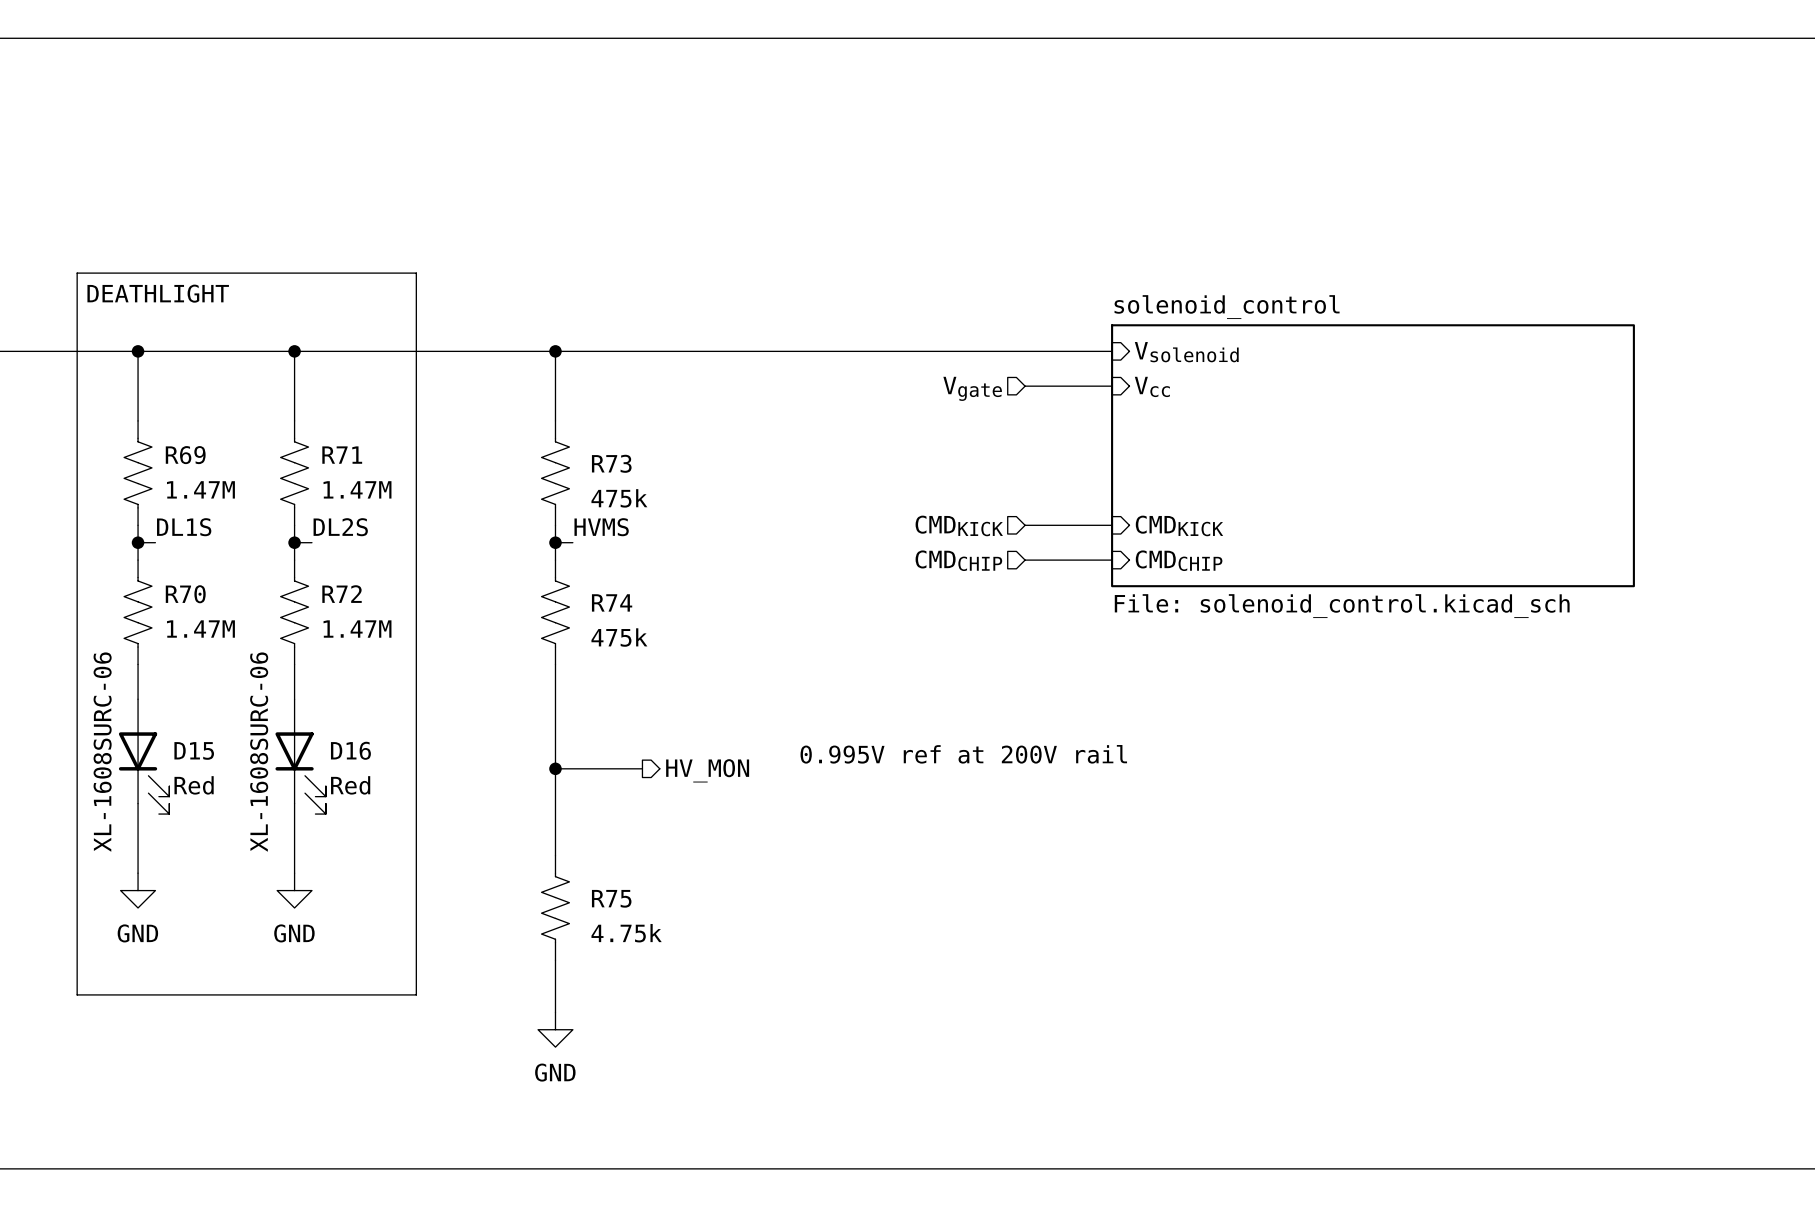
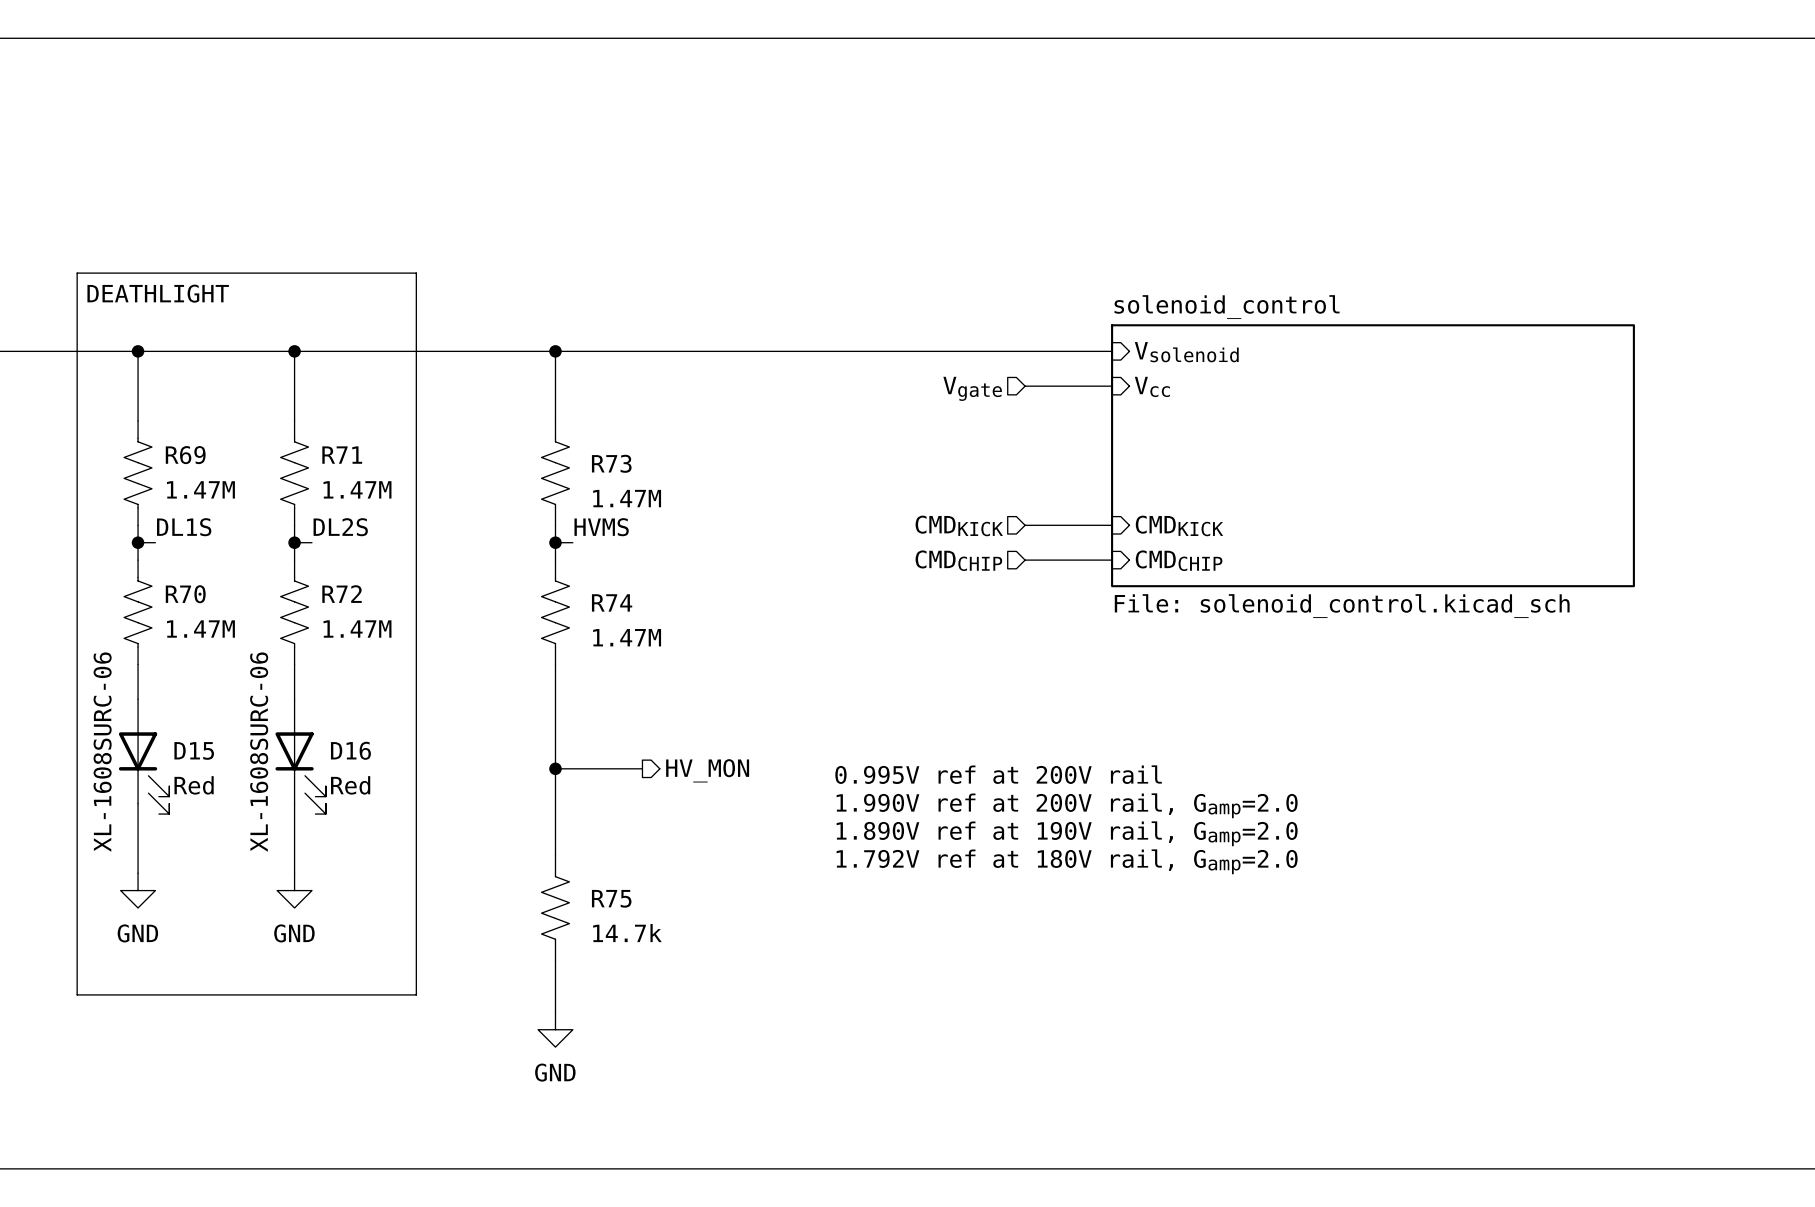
R73 value: 475k (619, 498) -> 1.47M (627, 498)
R74 value: 475k (619, 637) -> 1.47M (627, 637)
text position: 0.995V ref at 200V rail (963, 754) -> 0.995V ref at 200V rail (998, 774)
text: none -> 1.990V ref at 200V rail, Gamp=2.0 (1067, 805)
text: none -> 1.890V ref at 190V rail, Gamp=2.0 (1067, 833)
text: none -> 1.792V ref at 180V rail, Gamp=2.0 (1067, 861)
R75 value: 4.75k (626, 933) -> 14.7k (627, 933)

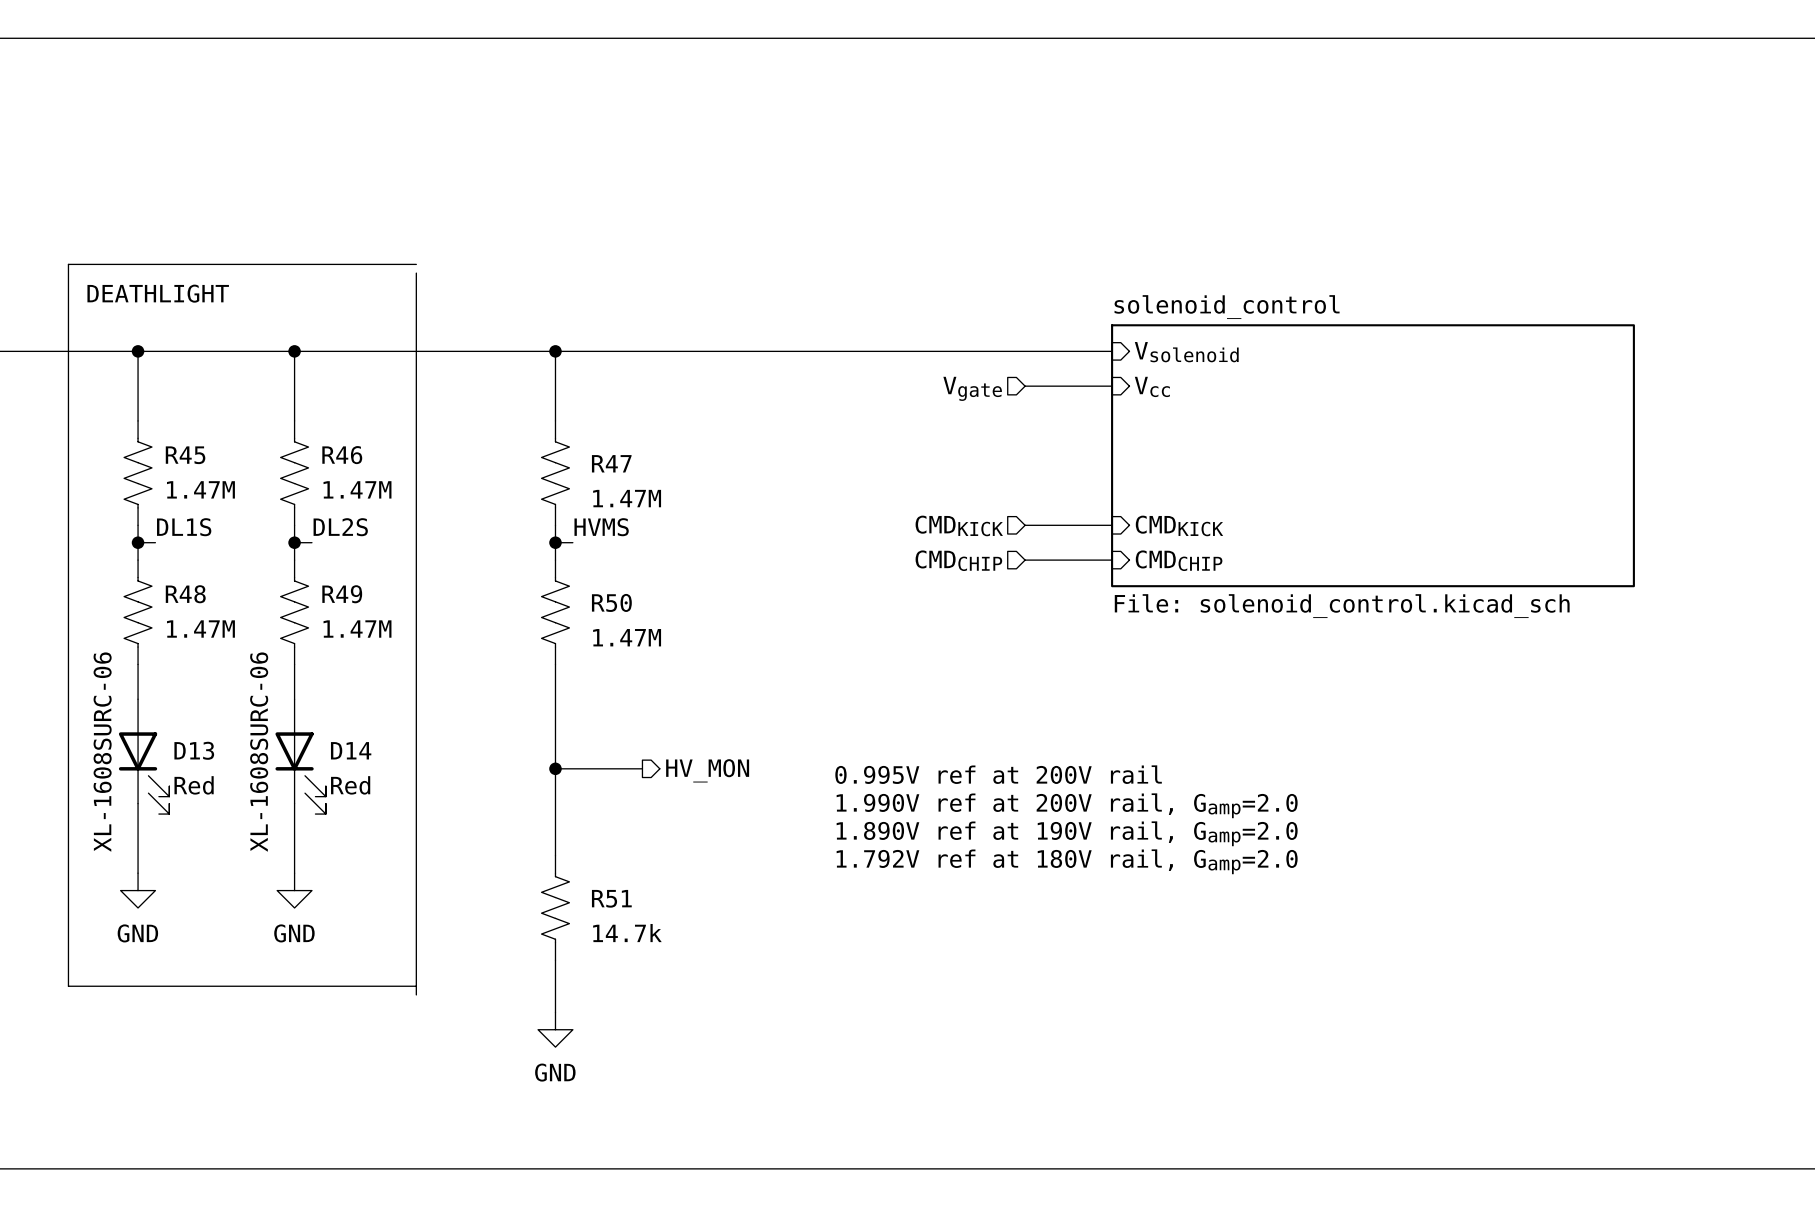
line: none -> (416, 264) (68, 264) (68, 986) (416, 986)
line: (416, 273) (77, 273) (77, 994) (416, 994) -> none
R69 name: R69 (185, 455) -> R45 (185, 455)
R71 name: R71 (342, 455) -> R46 (342, 455)
R73 name: R73 (611, 463) -> R47 (611, 463)
R70 name: R70 (185, 594) -> R48 (185, 594)
R72 name: R72 (342, 594) -> R49 (342, 594)
R74 name: R74 (612, 602) -> R50 (611, 602)
D15 name: D15 (194, 750) -> D13 (194, 750)
D16 name: D16 (350, 750) -> D14 (351, 750)
R75 name: R75 (611, 898) -> R51 (611, 898)

